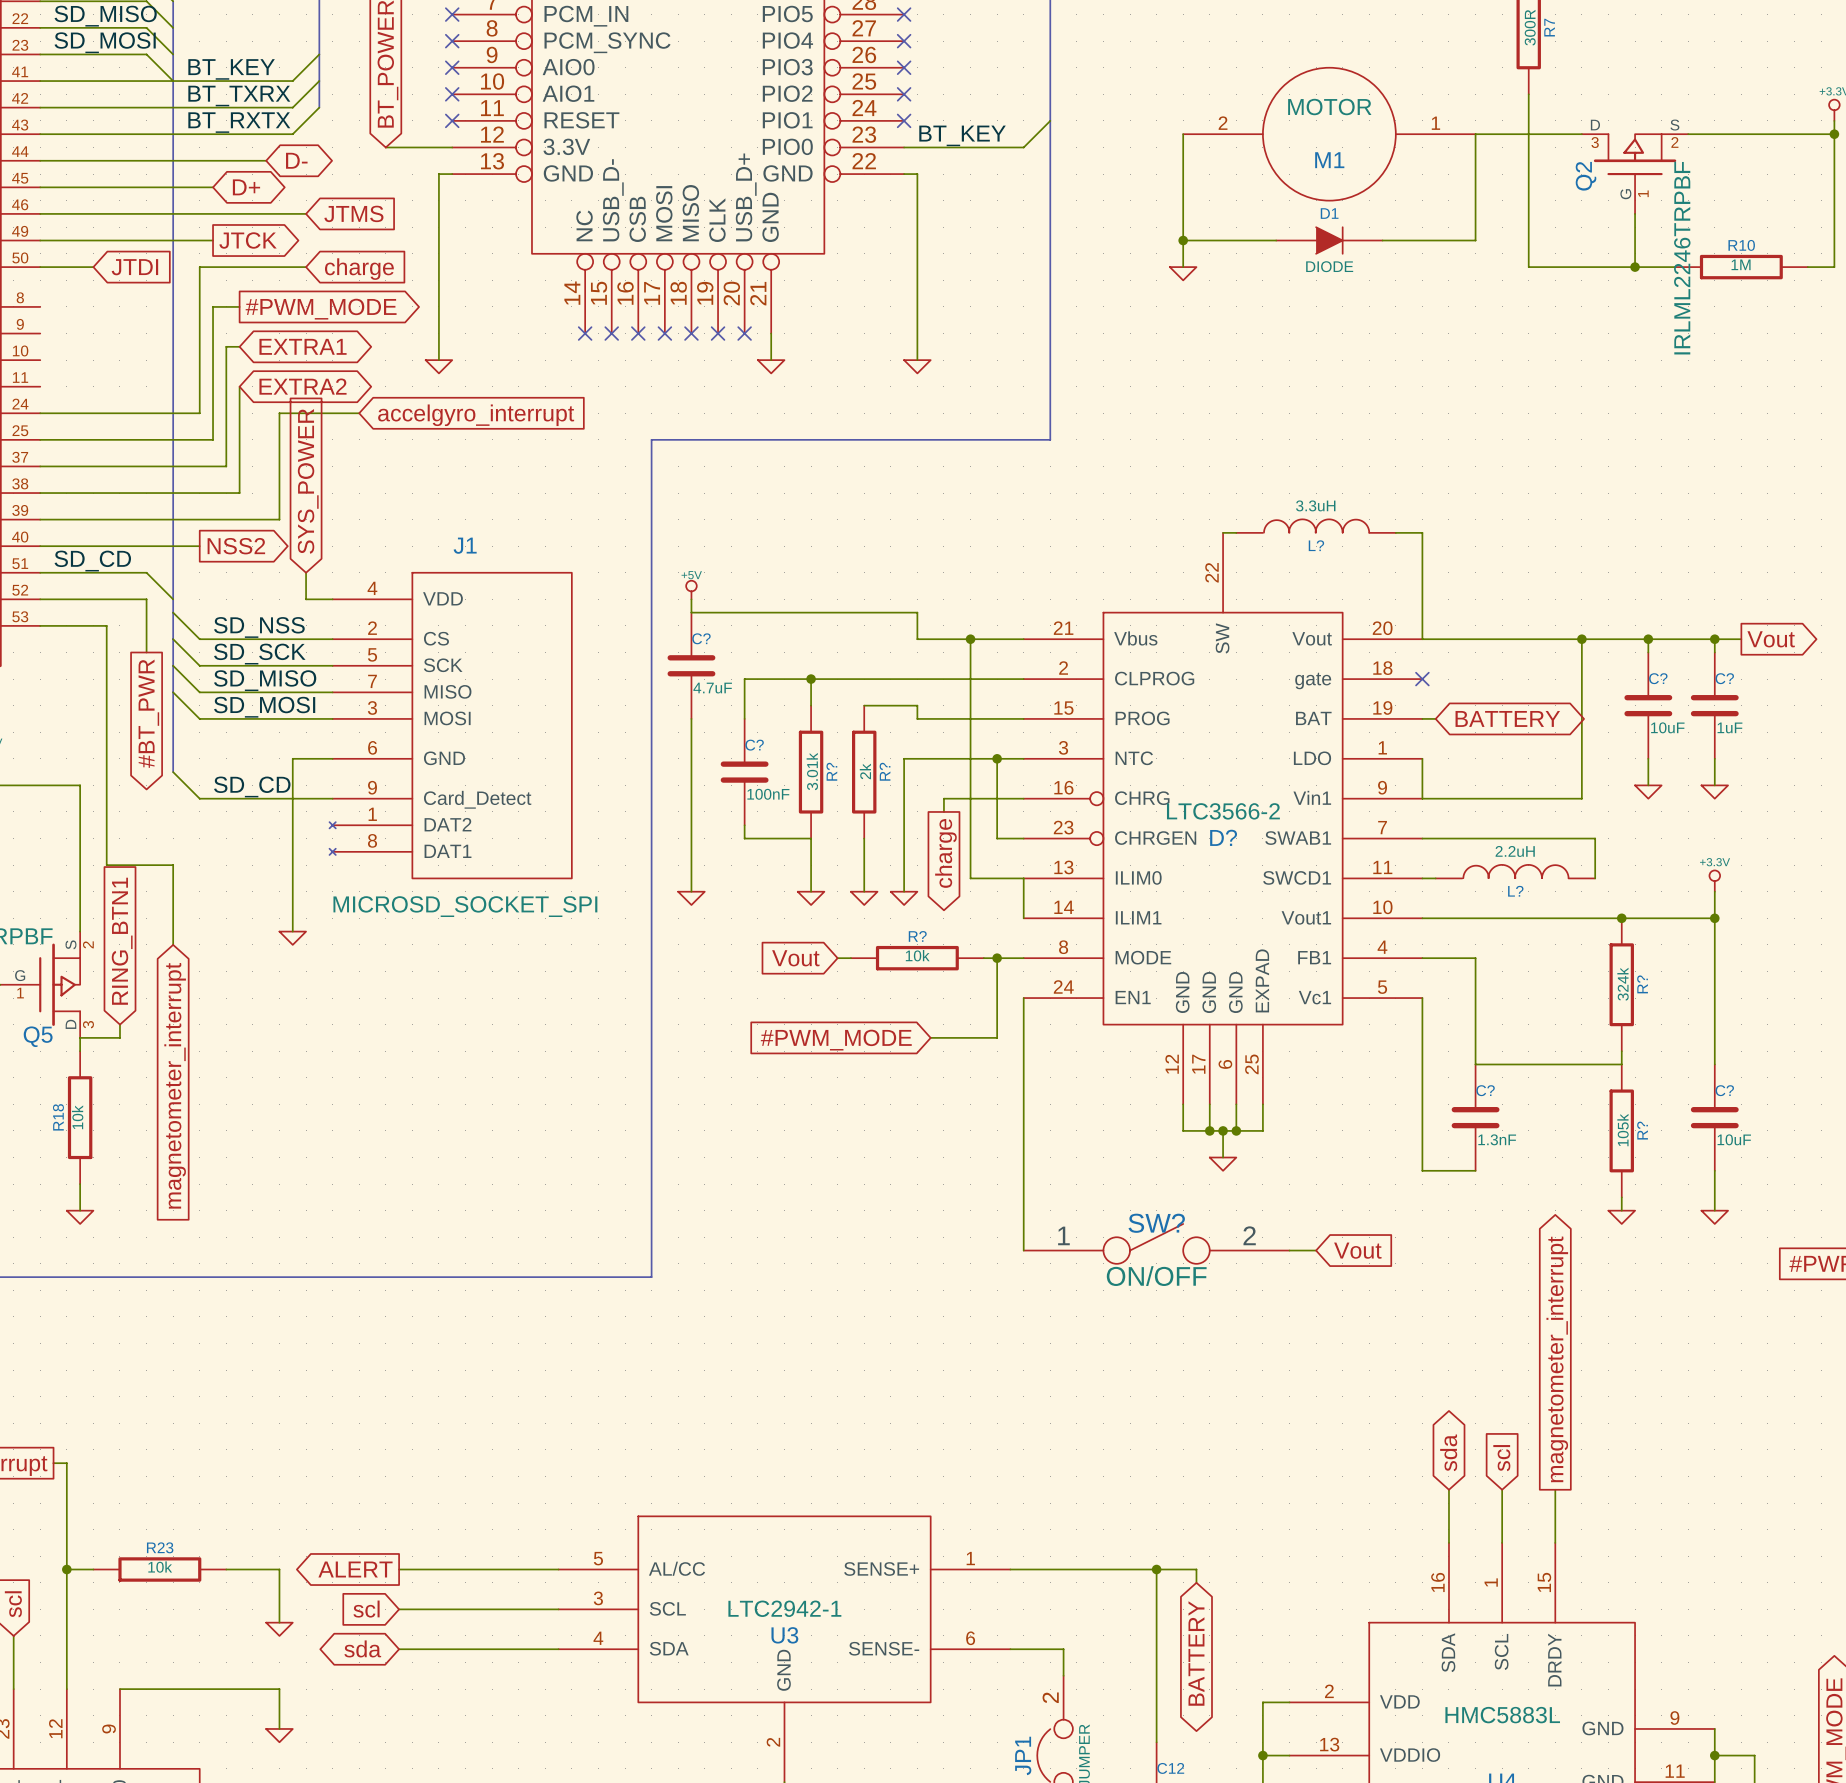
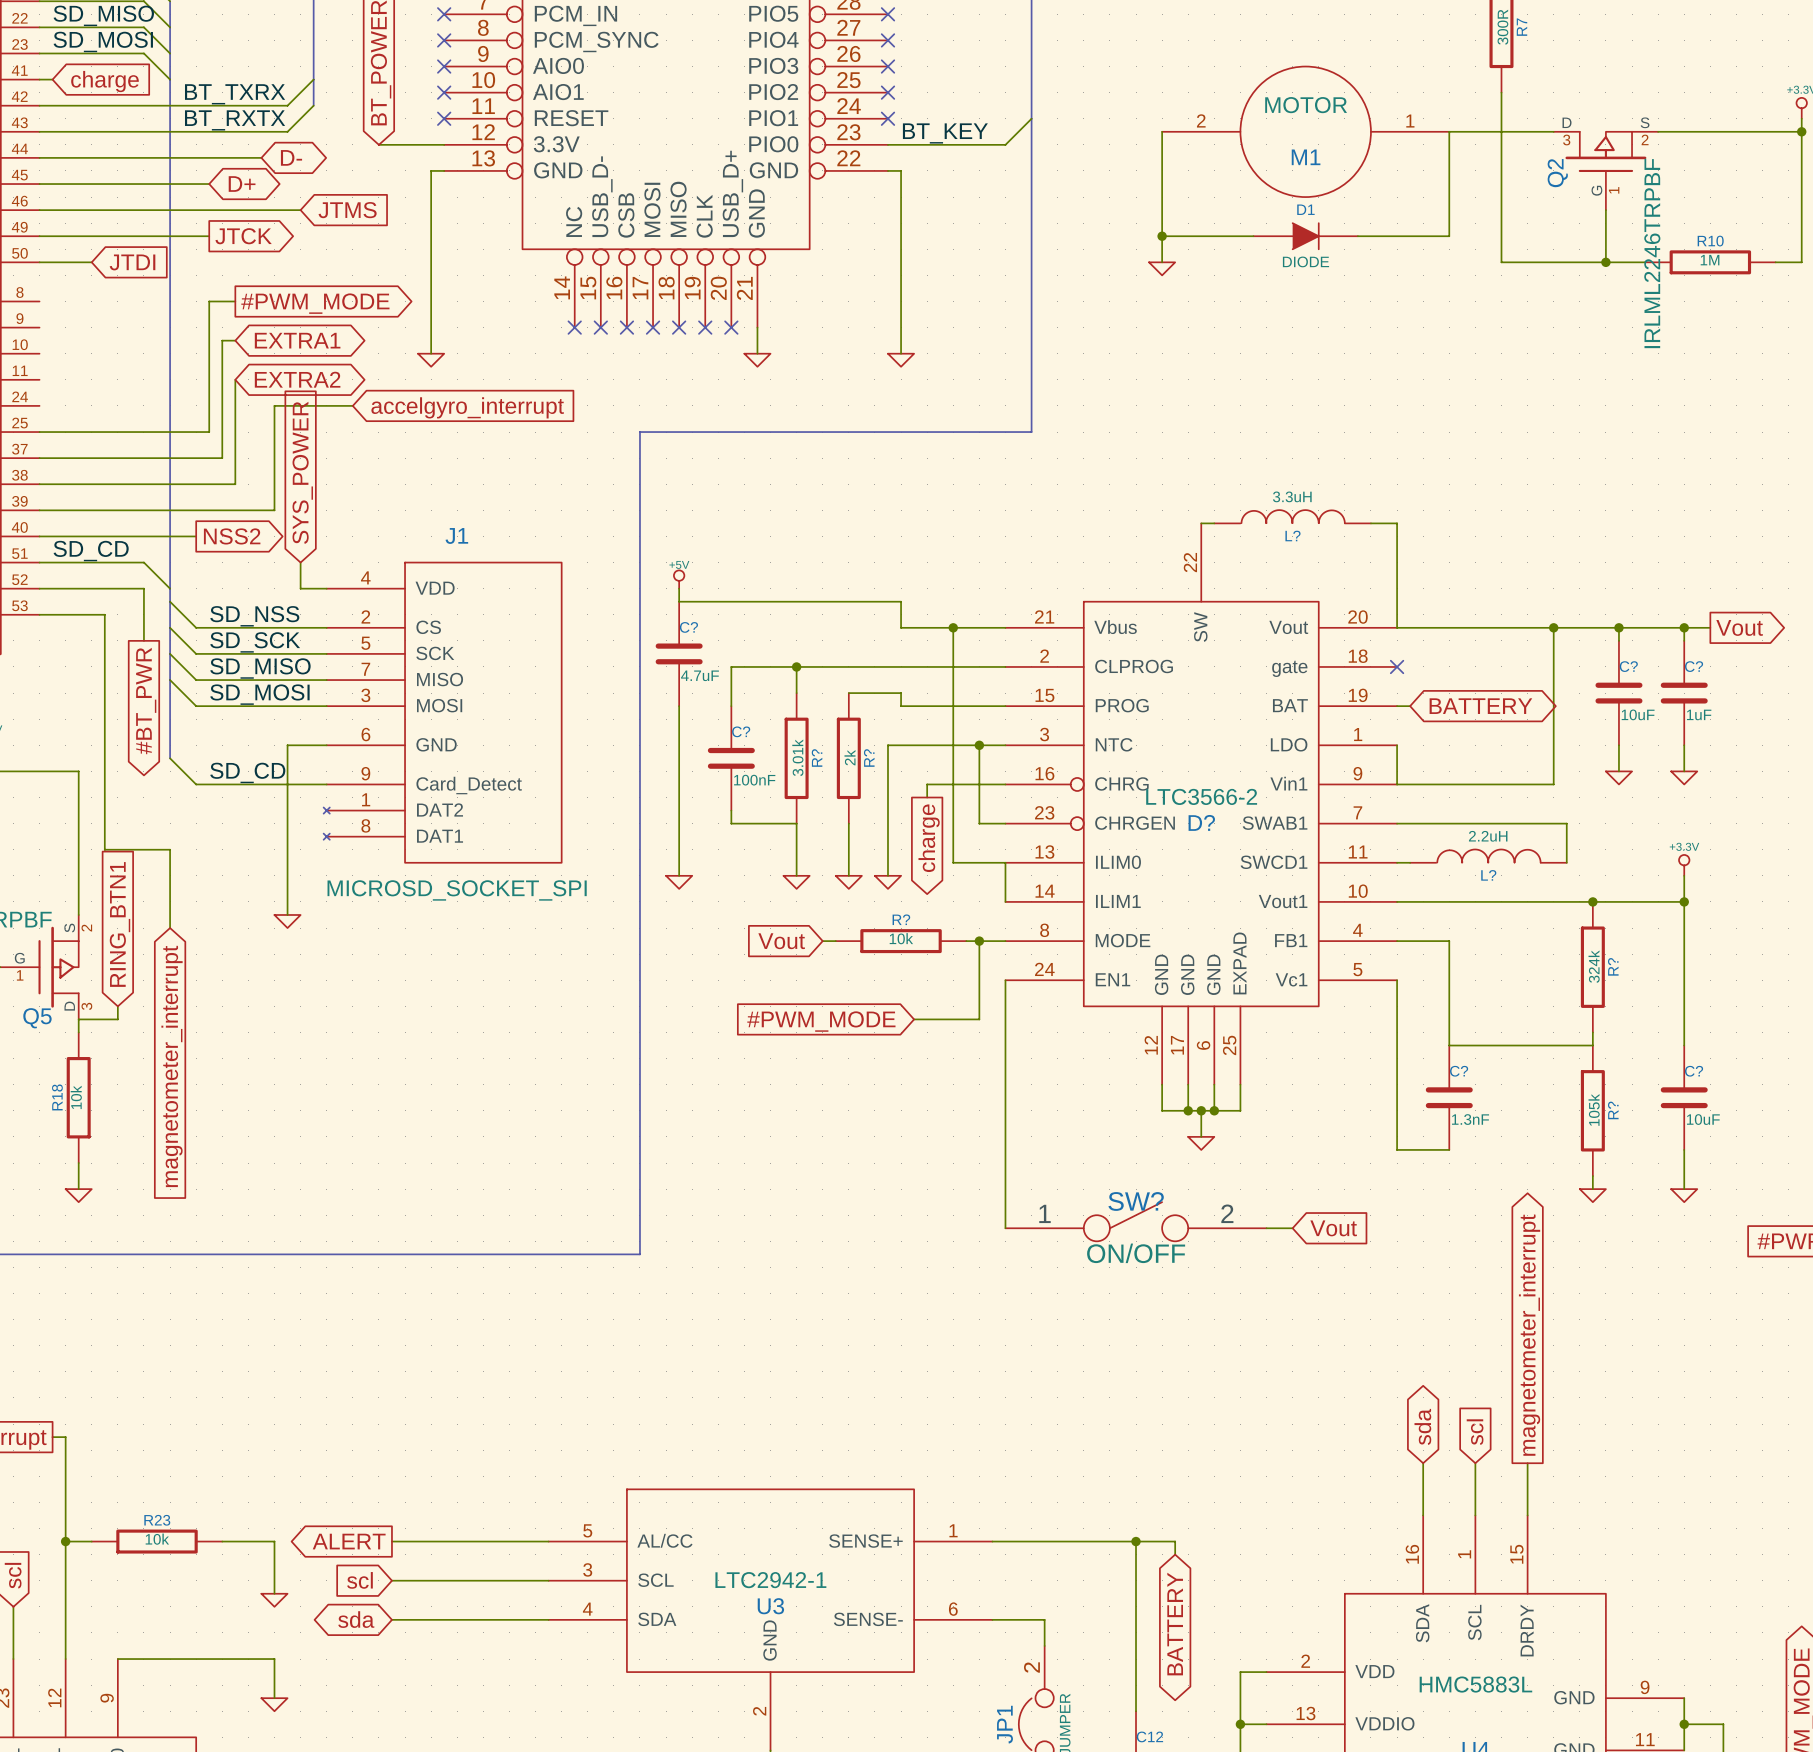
wire: (319, 54) (292, 81) (53, 81) -> none
label: BT_KEY (231, 69) -> none
global label: none -> charge (105, 81)
wire: (306, 267) (199, 267) (199, 413) (40, 413) -> none
global label: charge (359, 269) -> none

